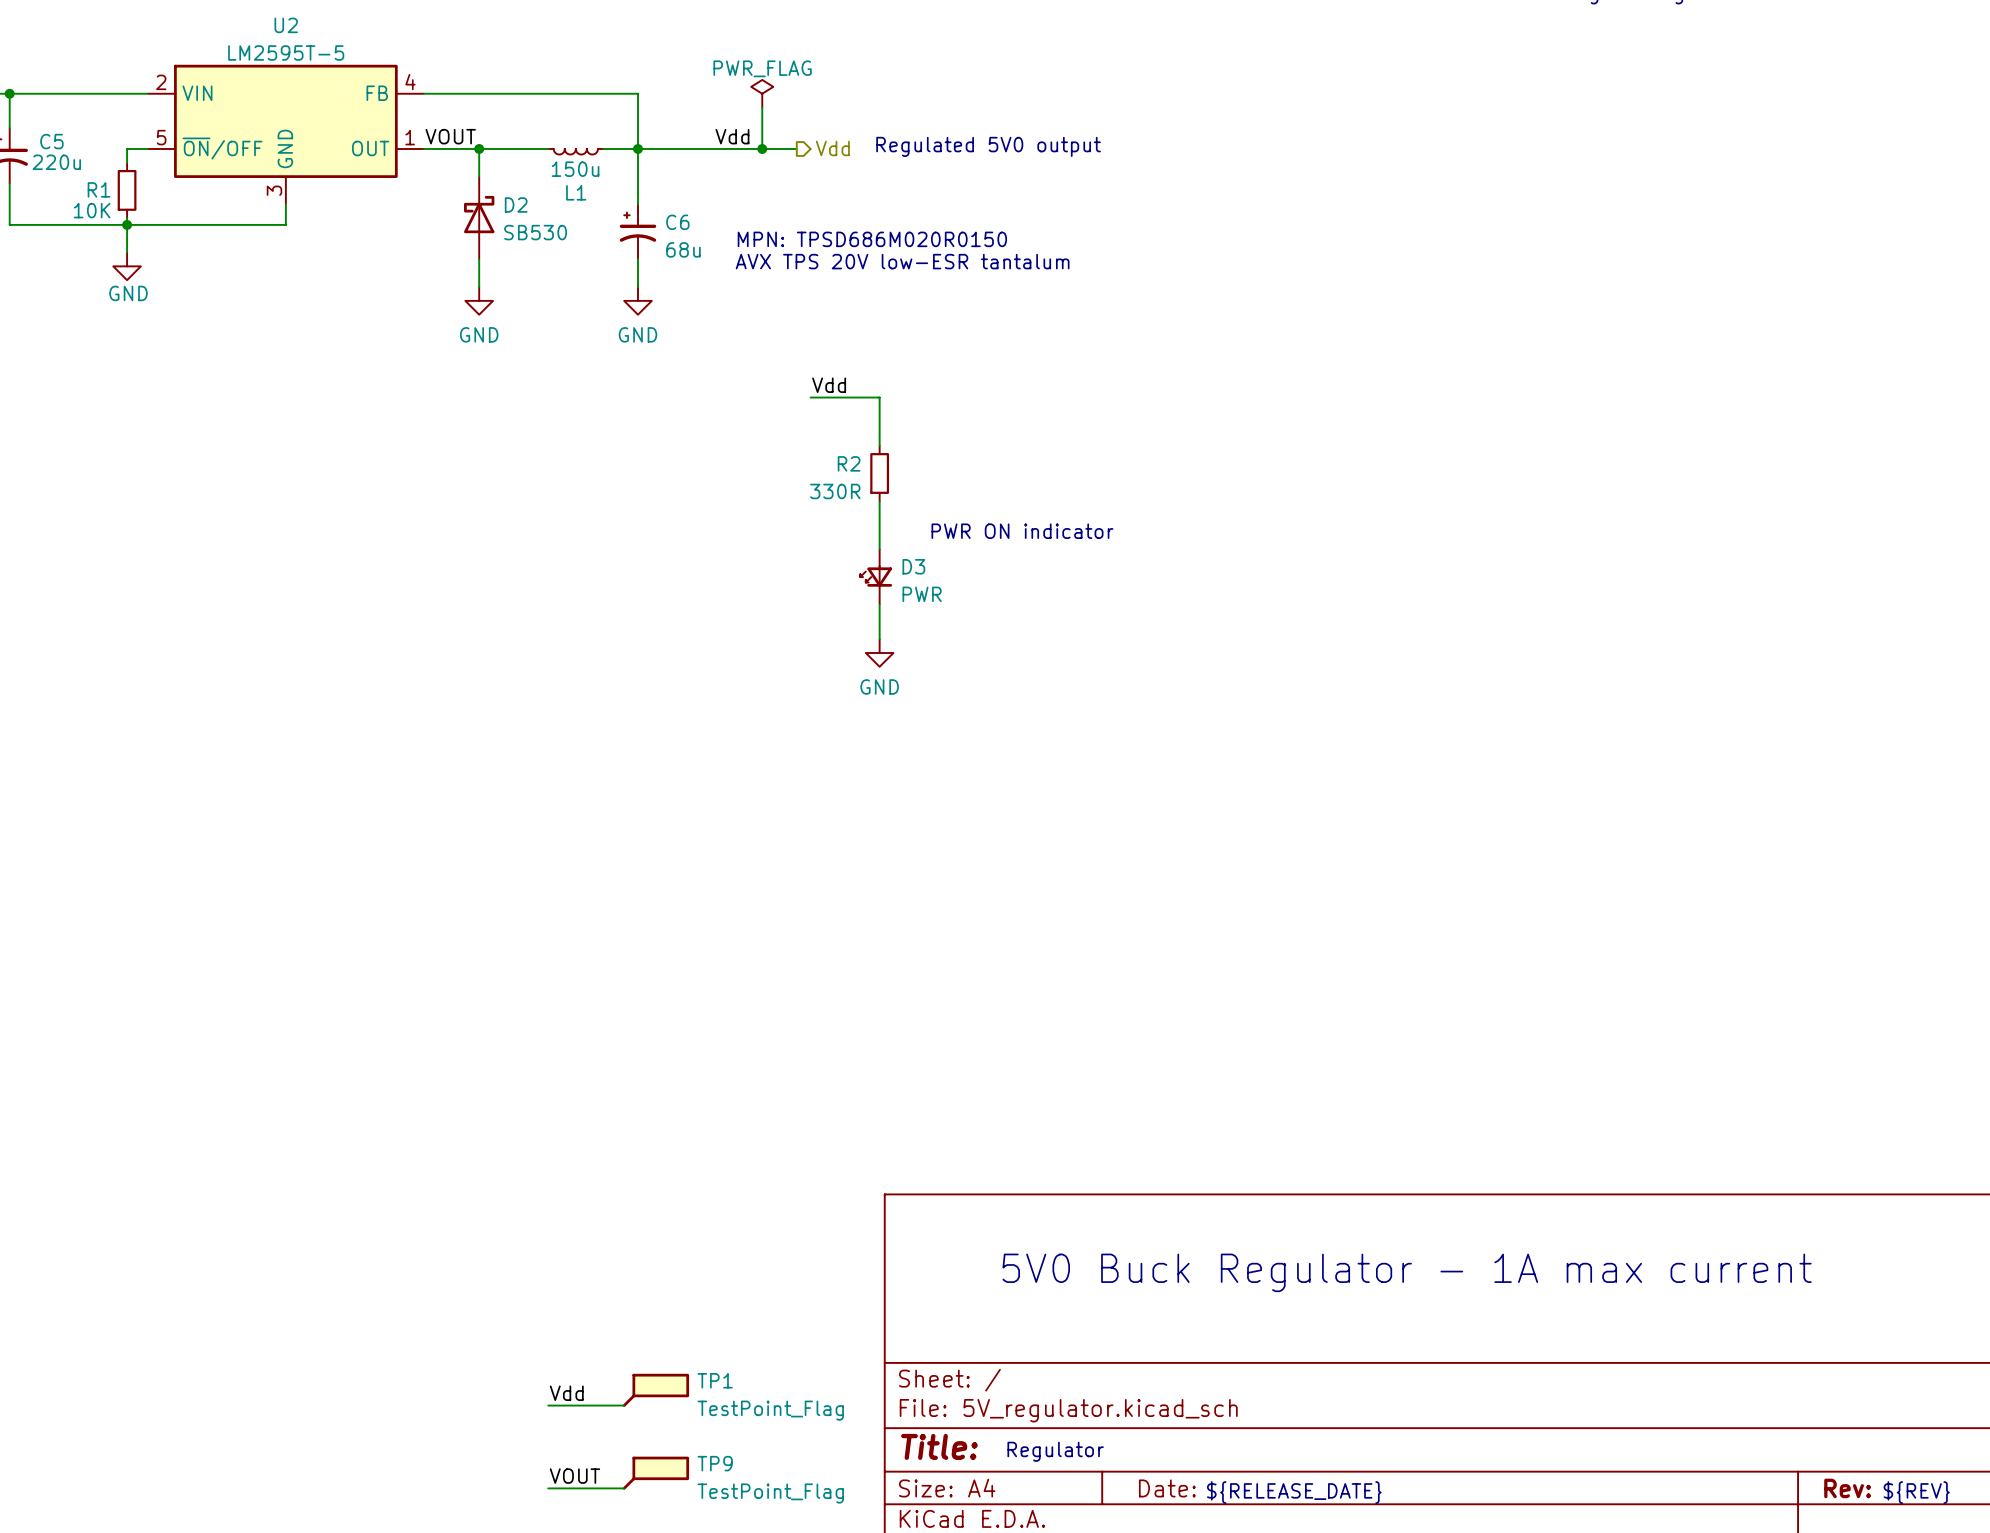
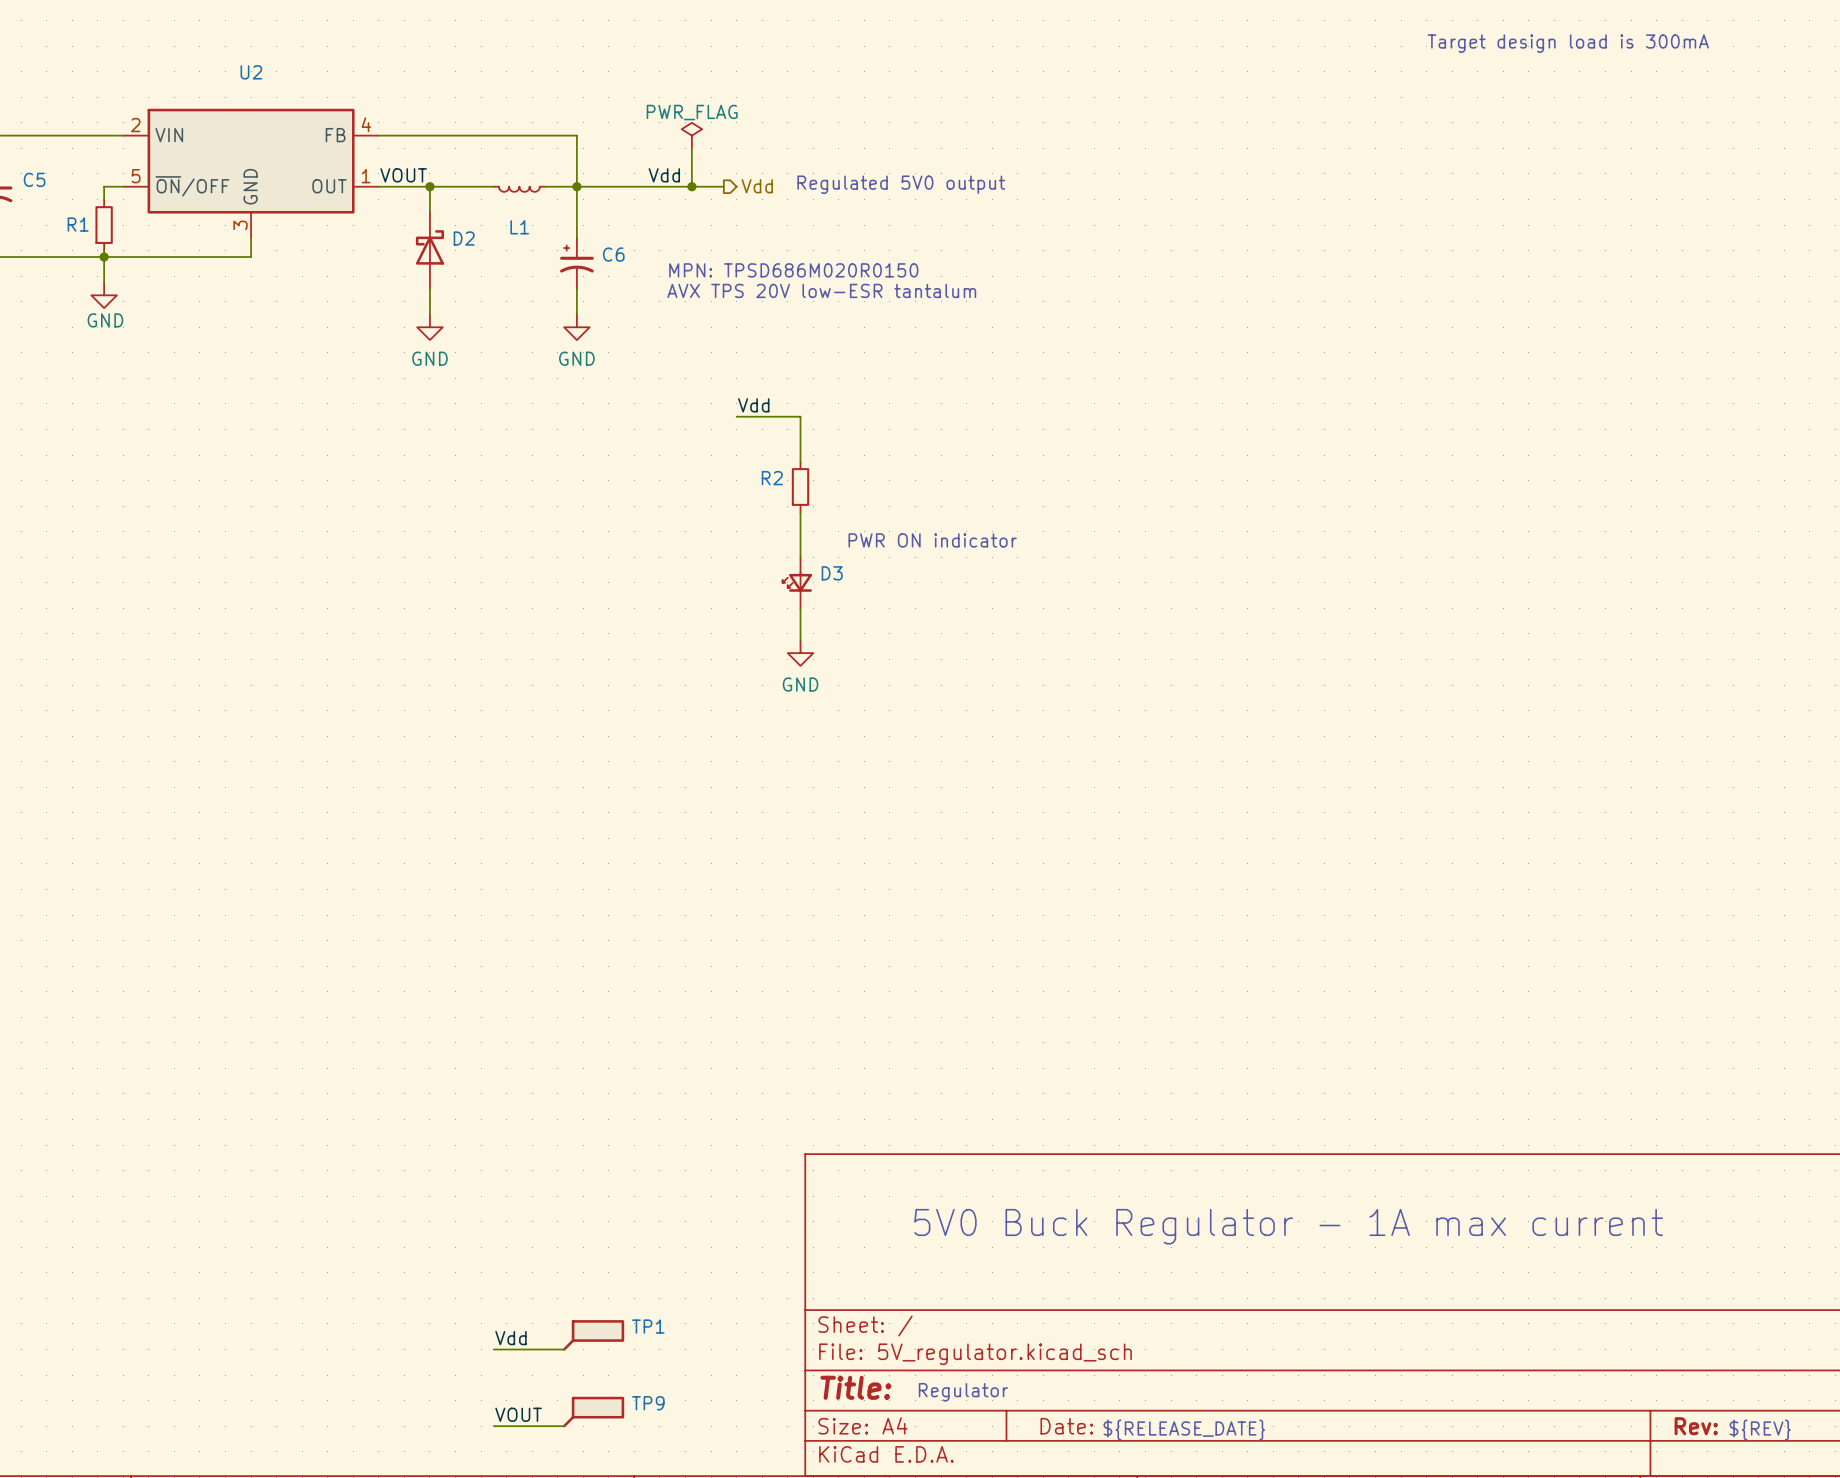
U2 value: LM2595T-5 (286, 52) -> none
C5 value: 220u (56, 162) -> none
L1 value: 150u (575, 169) -> none
R1 value: 10K (92, 210) -> none
D2 value: SB530 (535, 232) -> none
C6 value: 68u (683, 249) -> none
R2 value: 330R (835, 491) -> none
D3 value: PWR (922, 594) -> none
TP1 value: TestPoint_Flag (770, 1410) -> none
TP9 value: TestPoint_Flag (770, 1493) -> none

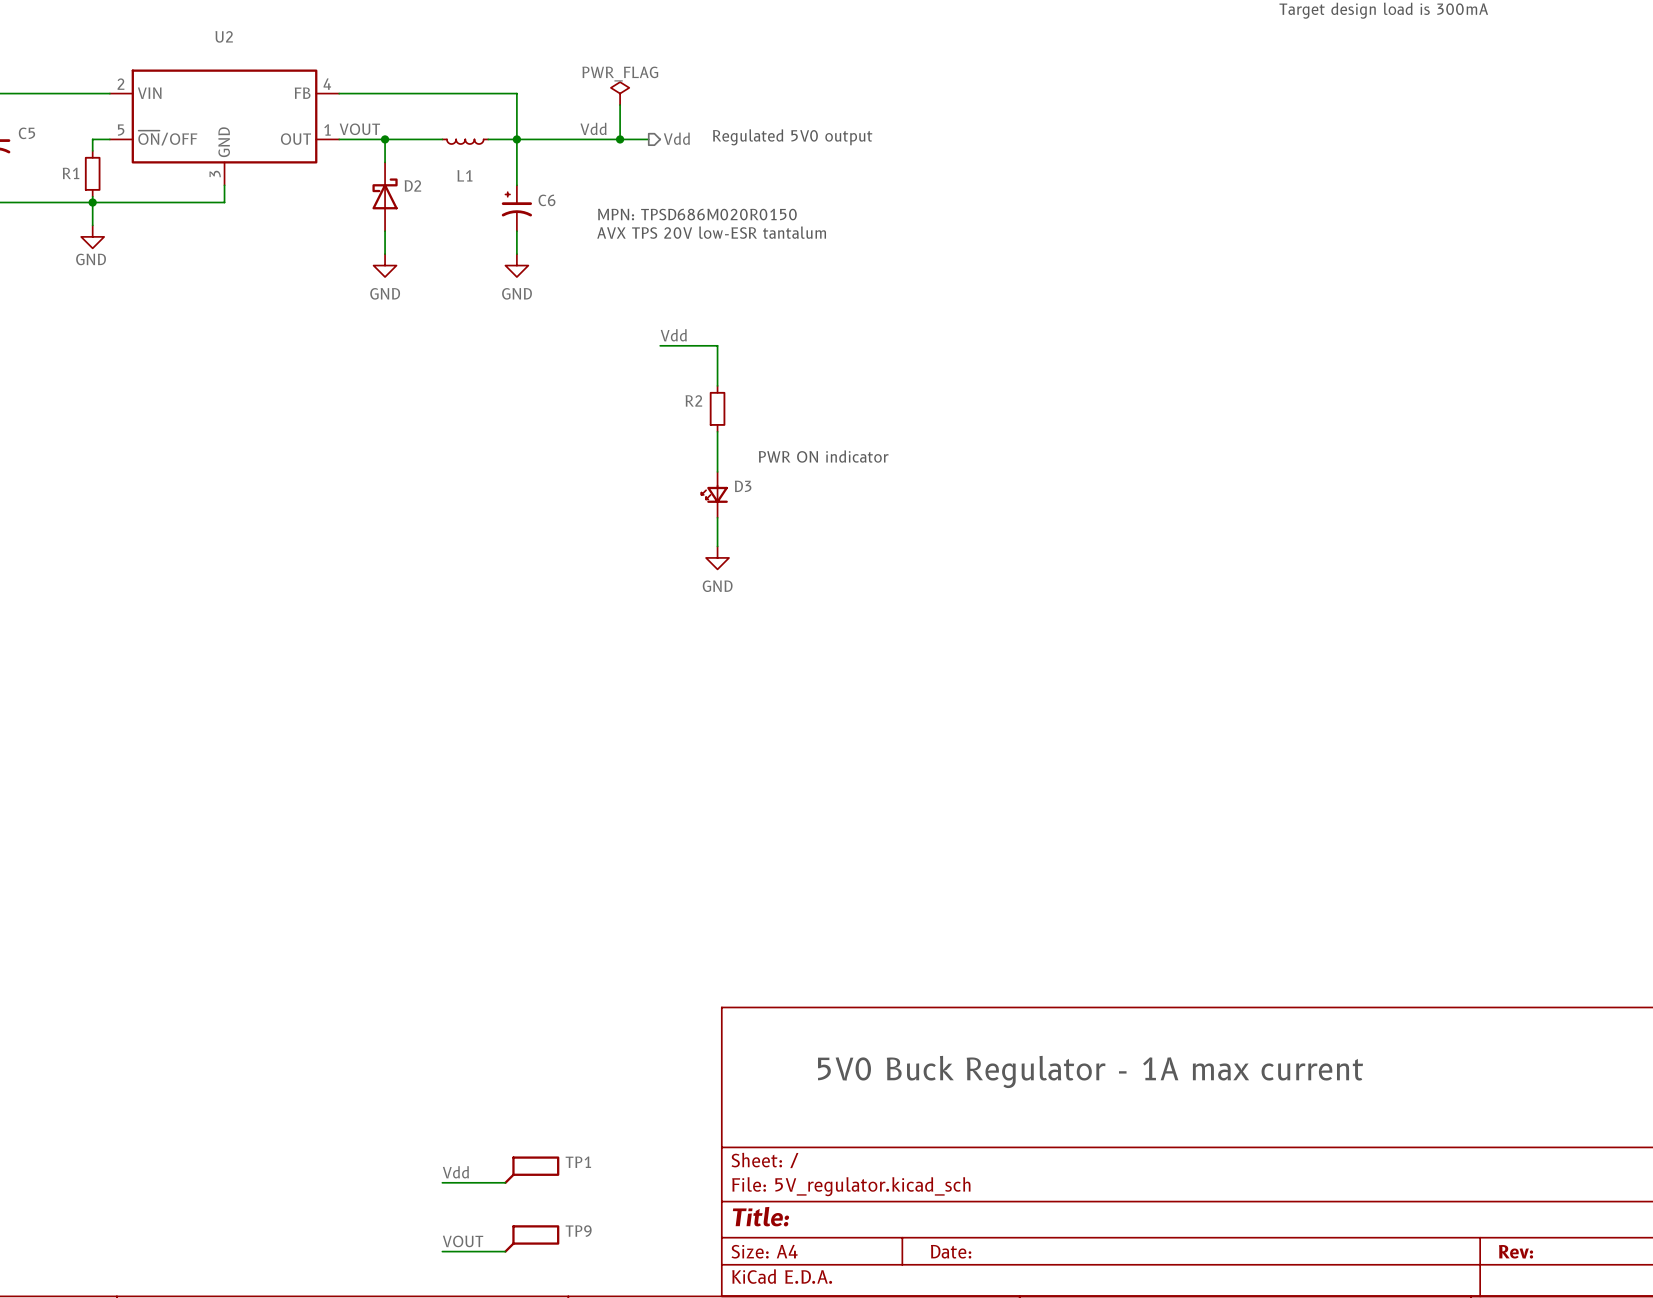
text: Regulator (963, 1392) -> none
text: ${RELEASE_DATE} (1184, 1430) -> none
text: ${REV} (1760, 1430) -> none

